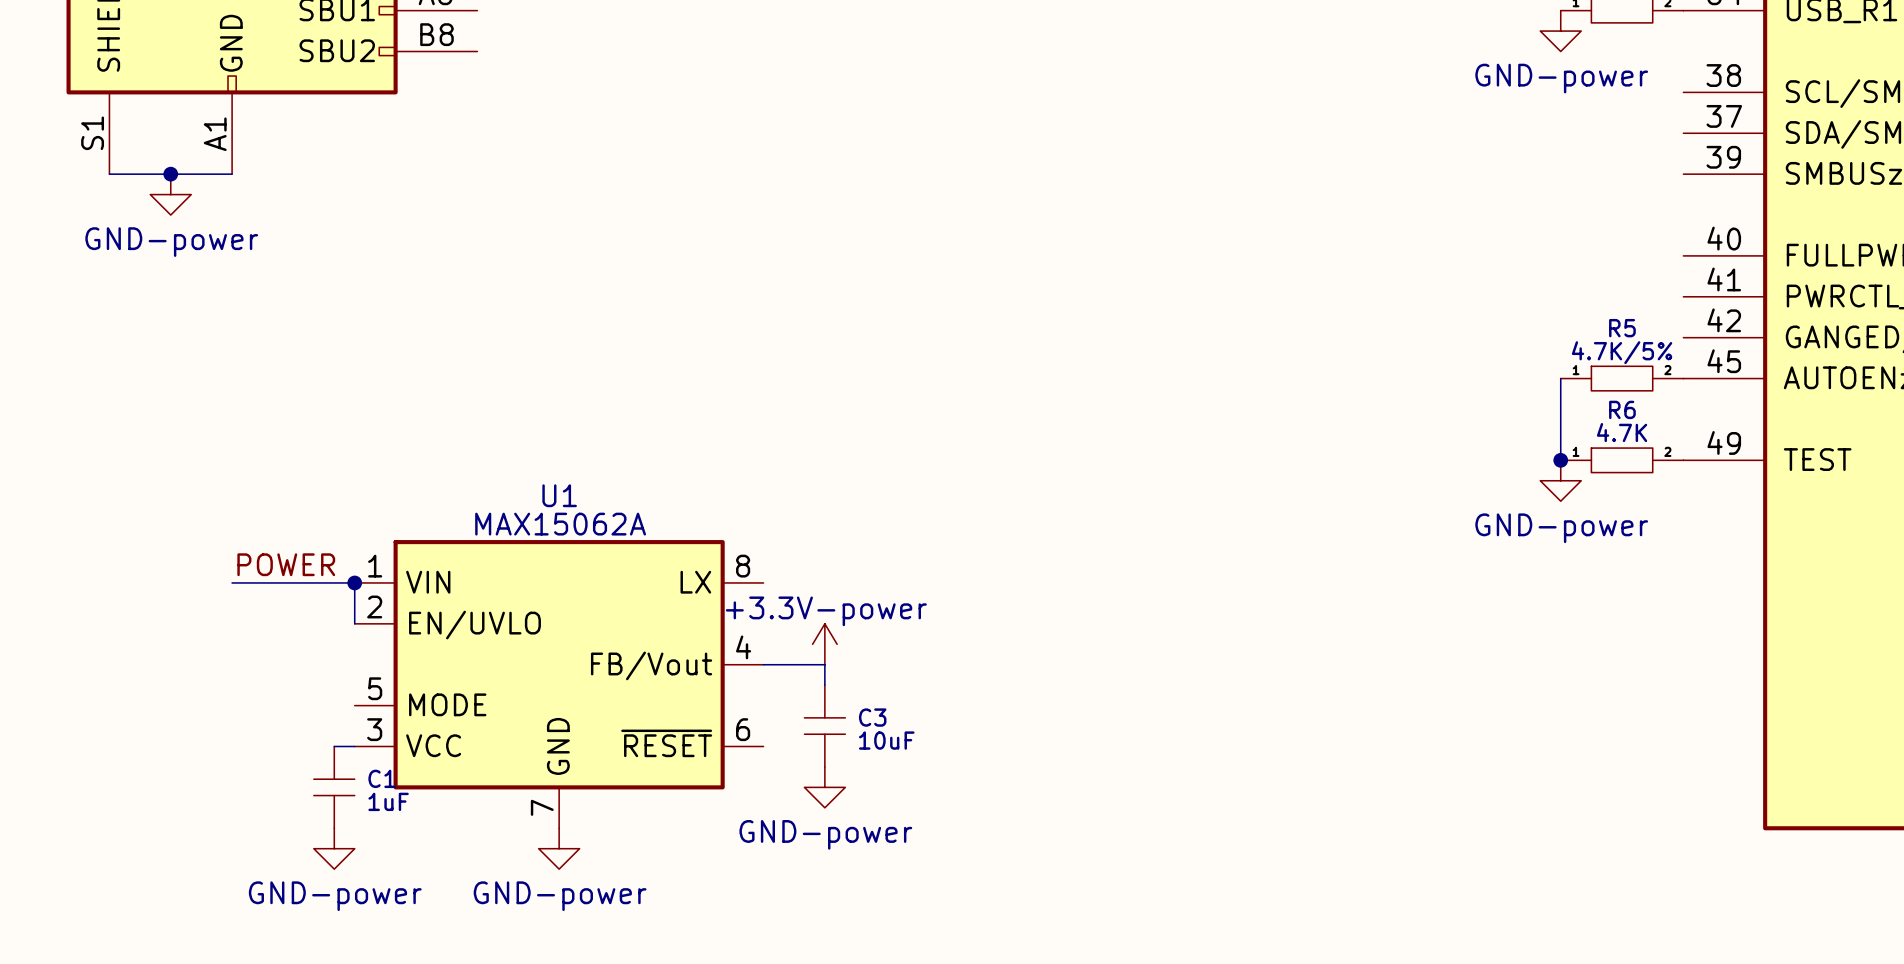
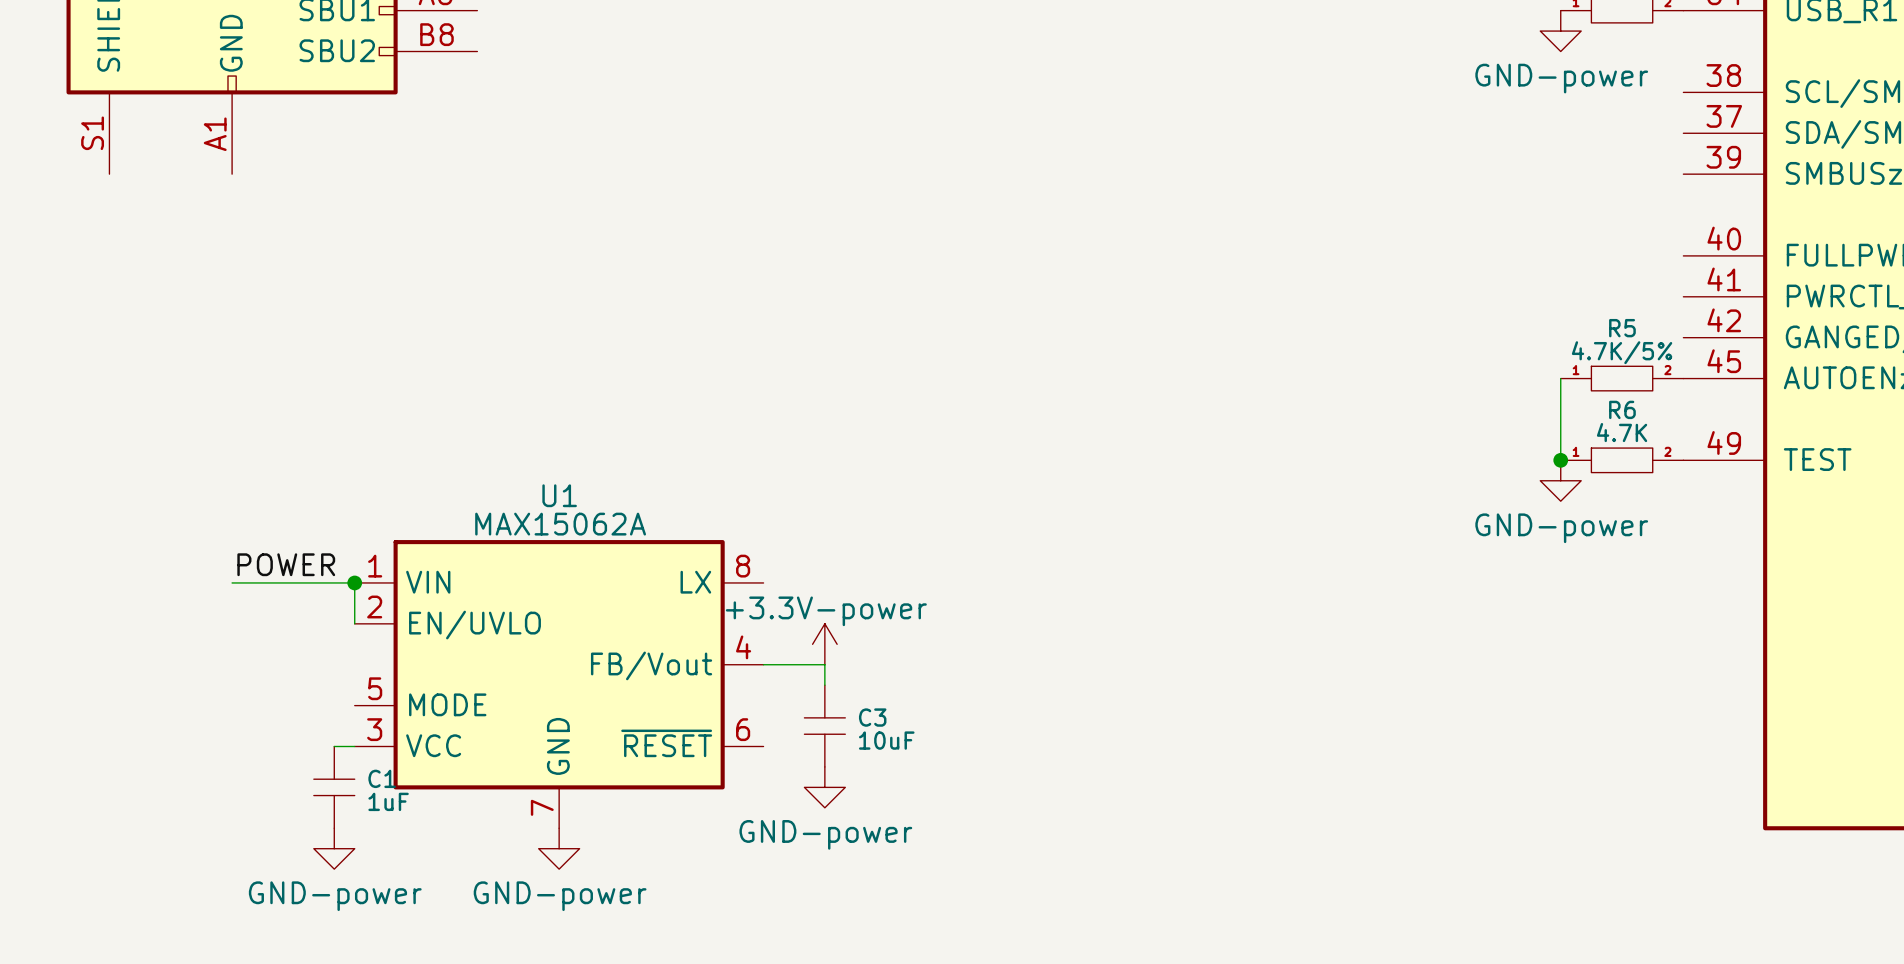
wire: (109, 174) (232, 174) -> none
junction: (170, 174) -> none
power symbol: GND-power (170, 194) -> none

